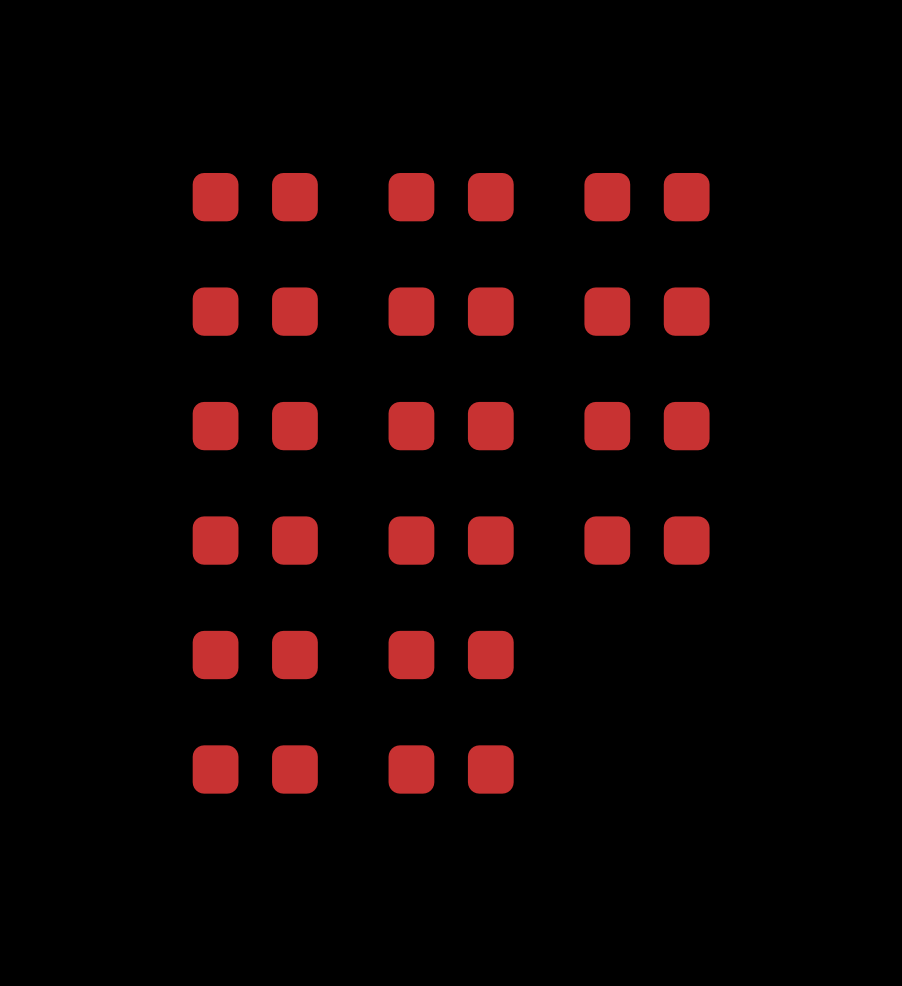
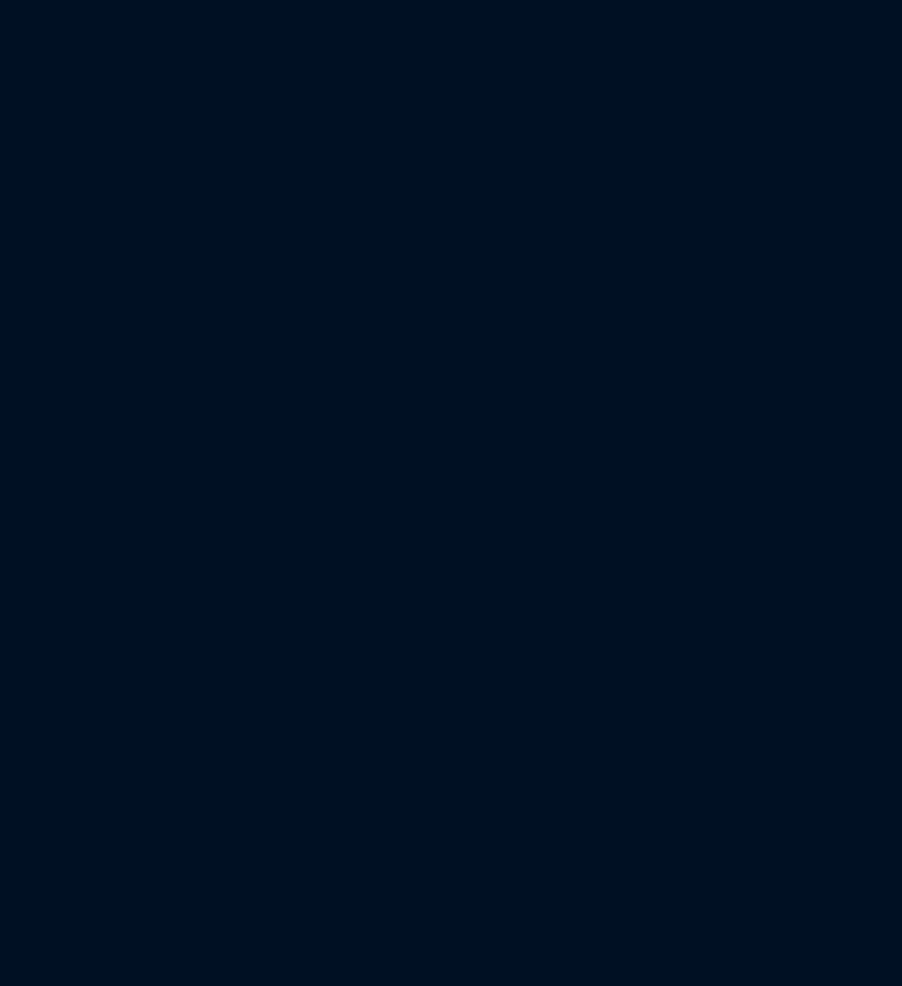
part: (255, 197) -> none
part: (451, 197) -> none
part: (646, 197) -> none
part: (255, 311) -> none
part: (451, 311) -> none
part: (646, 311) -> none
part: (255, 426) -> none
part: (451, 426) -> none
part: (646, 426) -> none
part: (255, 540) -> none
part: (451, 540) -> none
part: (646, 540) -> none
part: (255, 655) -> none
part: (451, 655) -> none
part: (255, 769) -> none
part: (451, 769) -> none

